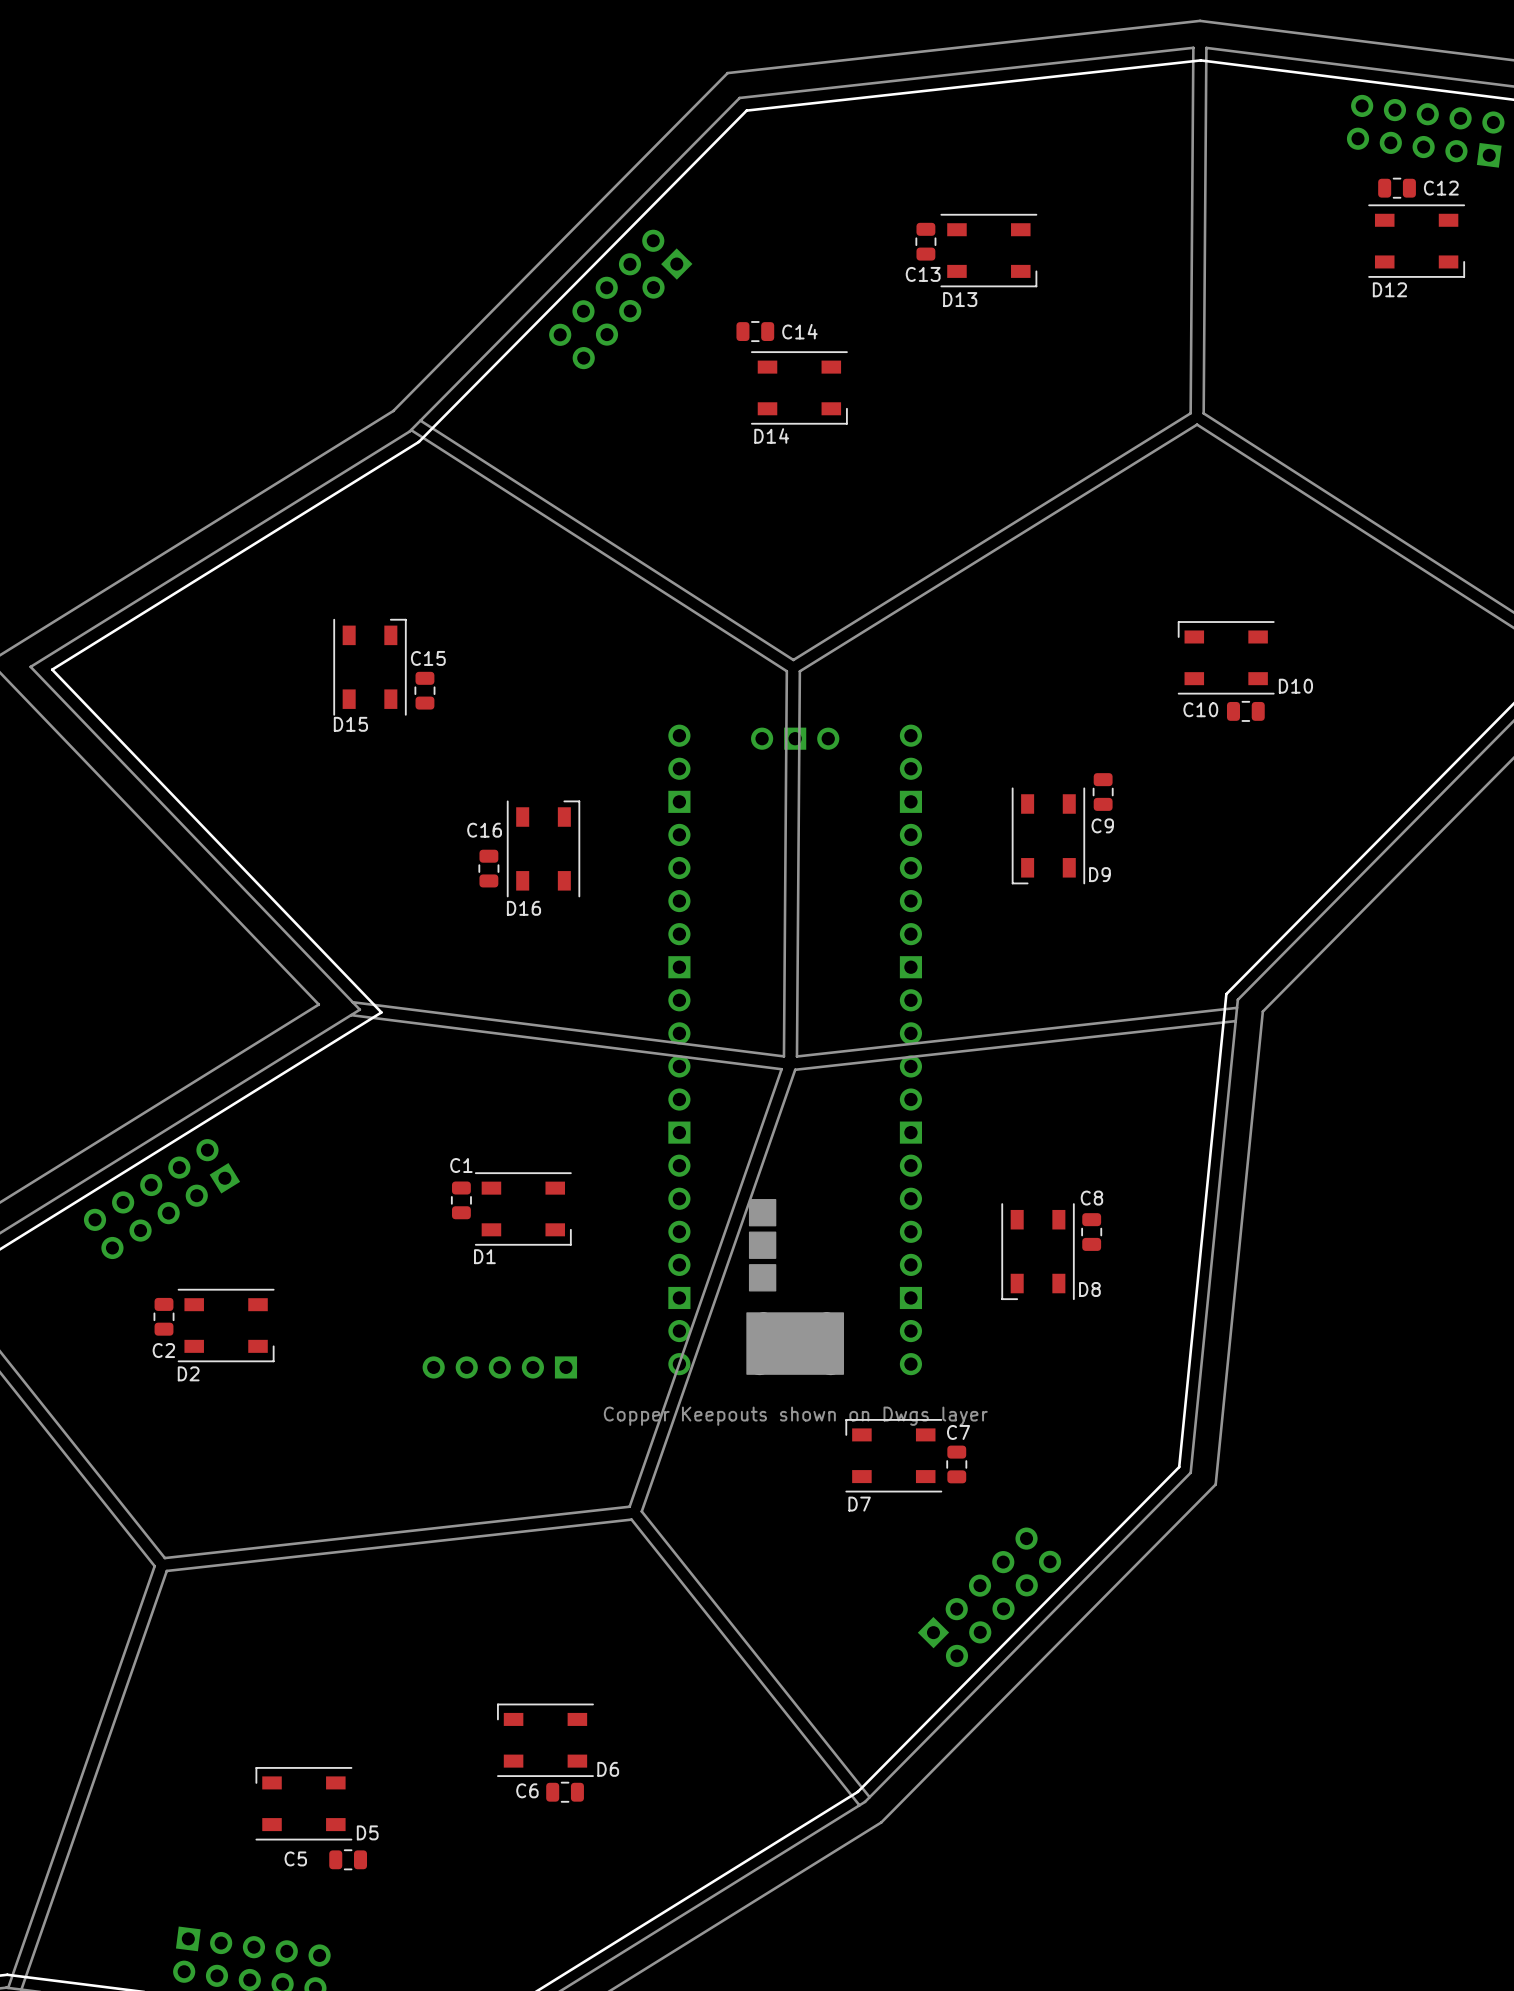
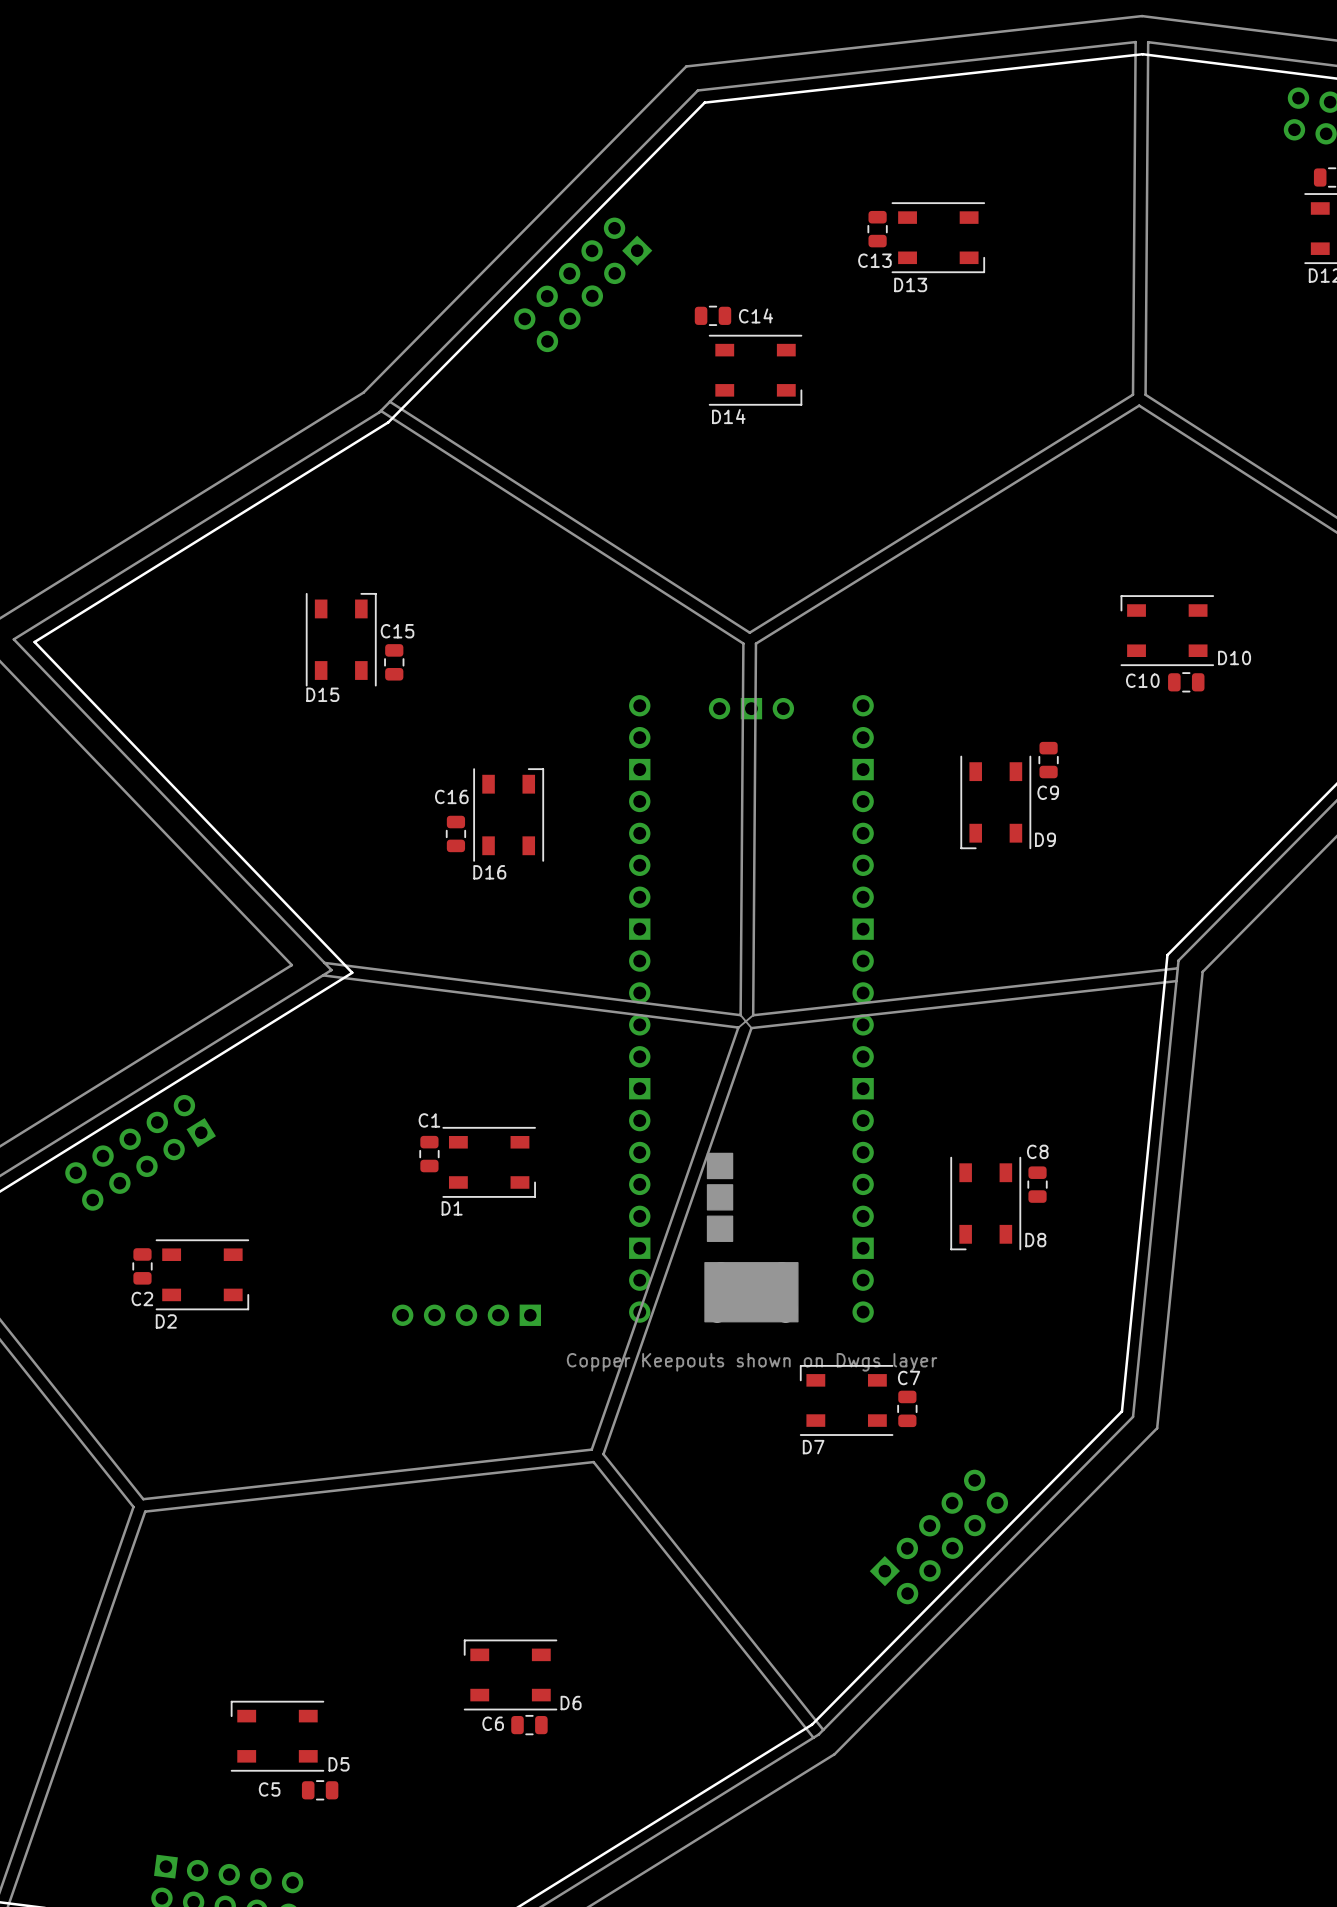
line: none -> (740, 1015) (751, 1028)
line: none -> (753, 1015) (738, 1027)

